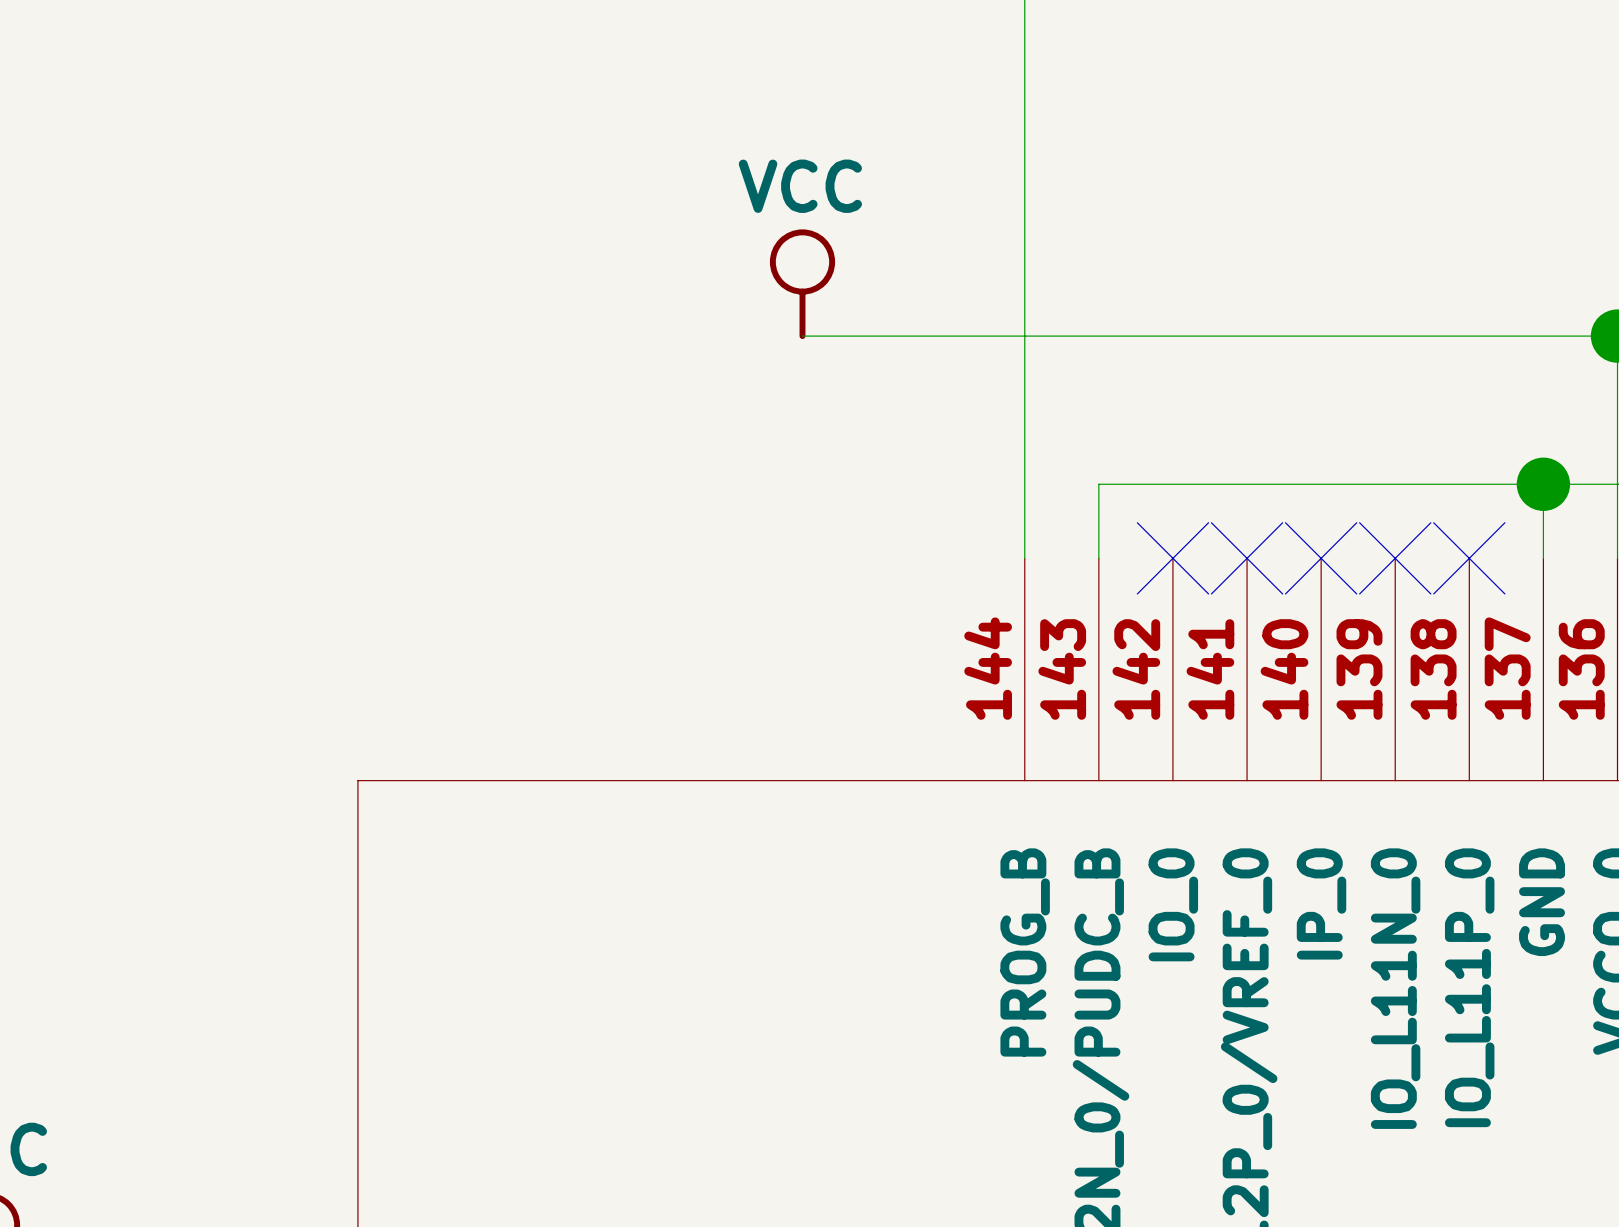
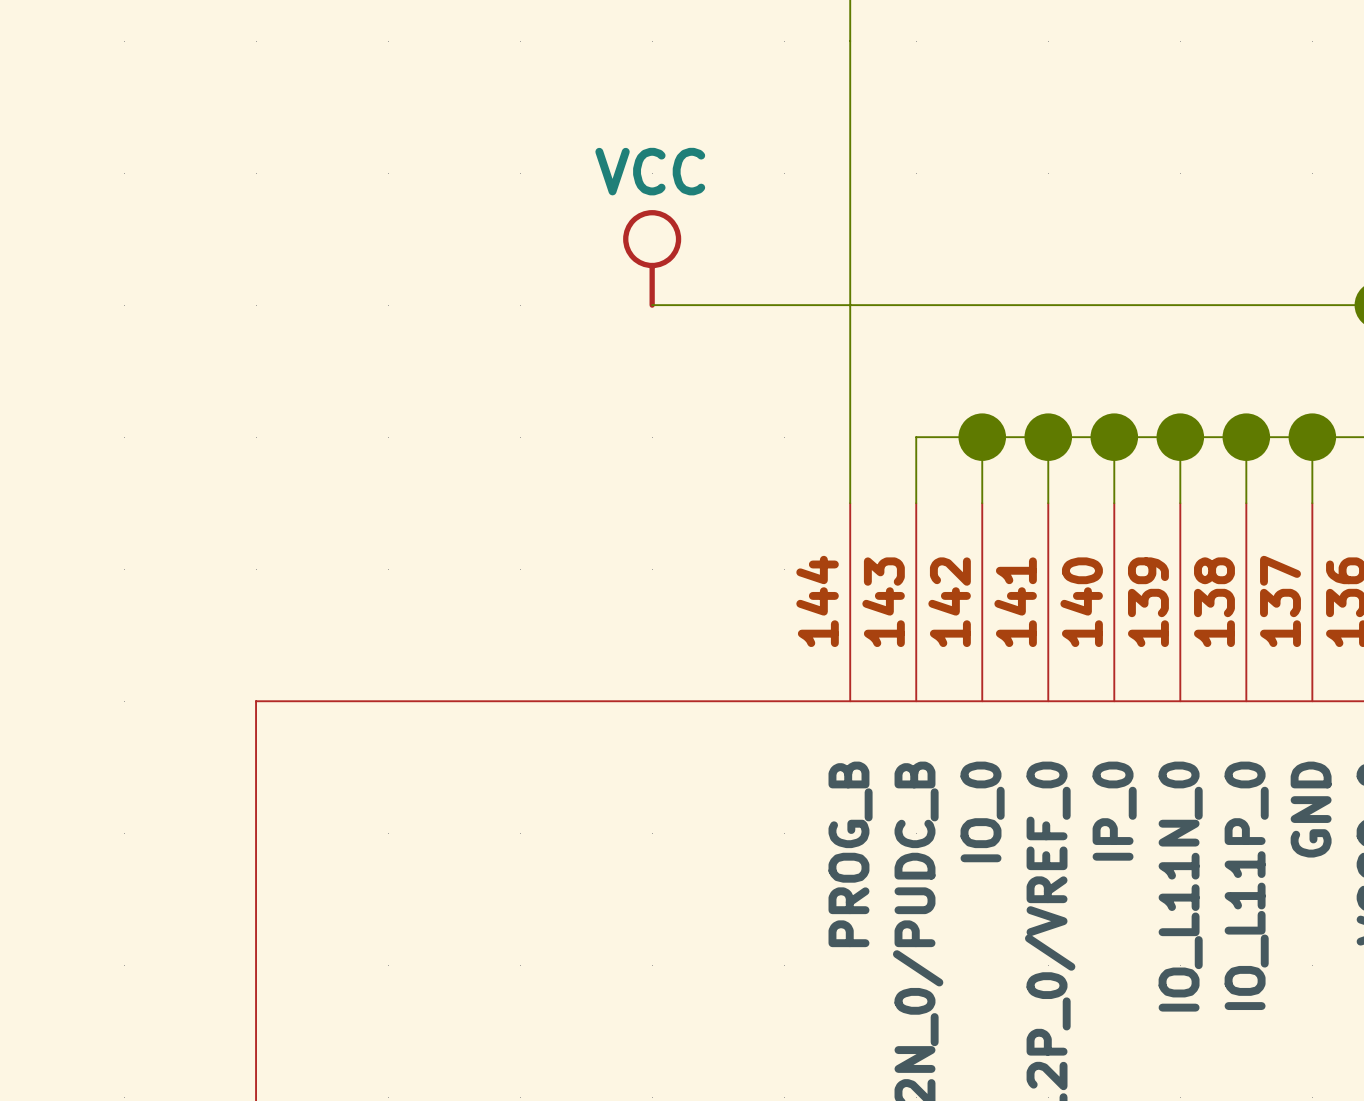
wire: none -> (982, 437) (982, 503)
junction: none -> (982, 437)
wire: none -> (1048, 437) (1048, 503)
junction: none -> (1048, 437)
wire: none -> (1114, 437) (1114, 503)
junction: none -> (1114, 437)
wire: none -> (1180, 437) (1180, 503)
junction: none -> (1180, 437)
wire: none -> (1246, 437) (1246, 503)
junction: none -> (1246, 437)
no-connect mark: (1172, 558) -> none
no-connect mark: (1247, 558) -> none
no-connect mark: (1321, 558) -> none
no-connect mark: (1395, 558) -> none
no-connect mark: (1469, 558) -> none

